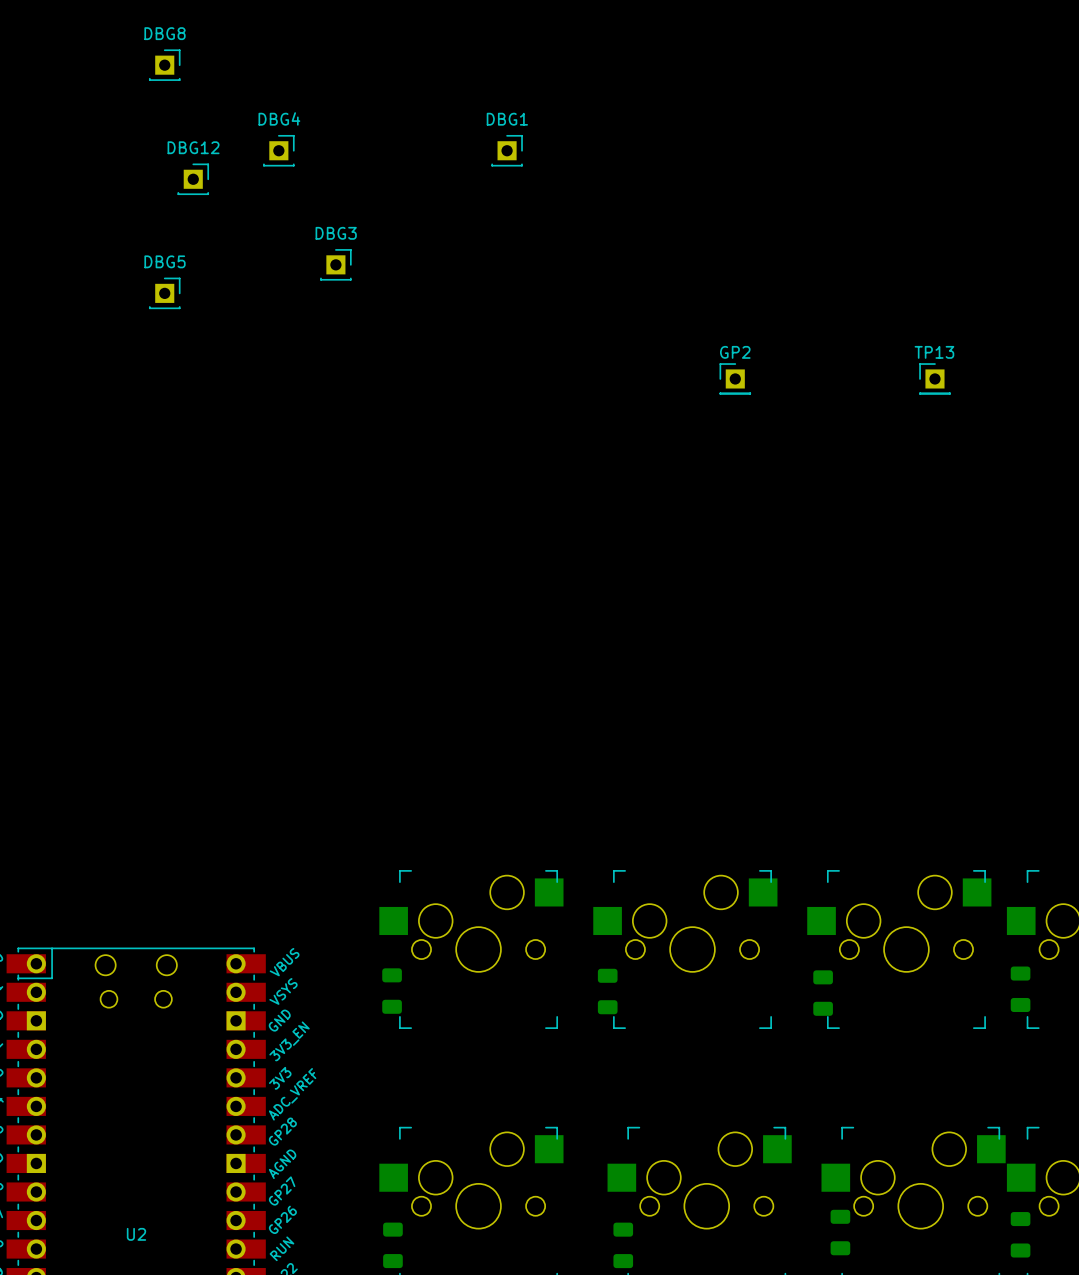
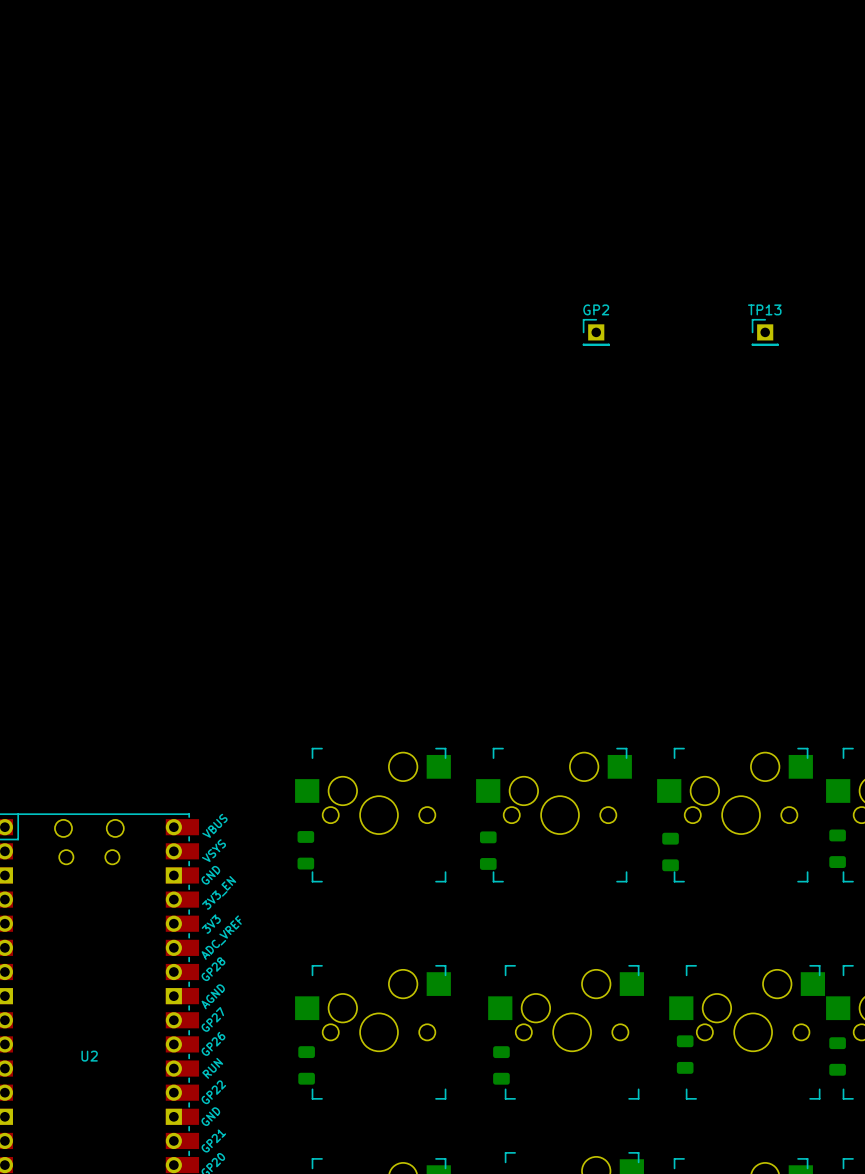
DBG8: (164, 65) -> none
DBG4: (278, 150) -> none
DBG1: (507, 150) -> none
DBG12: (193, 179) -> none
DBG3: (335, 264) -> none
DBG5: (164, 293) -> none

